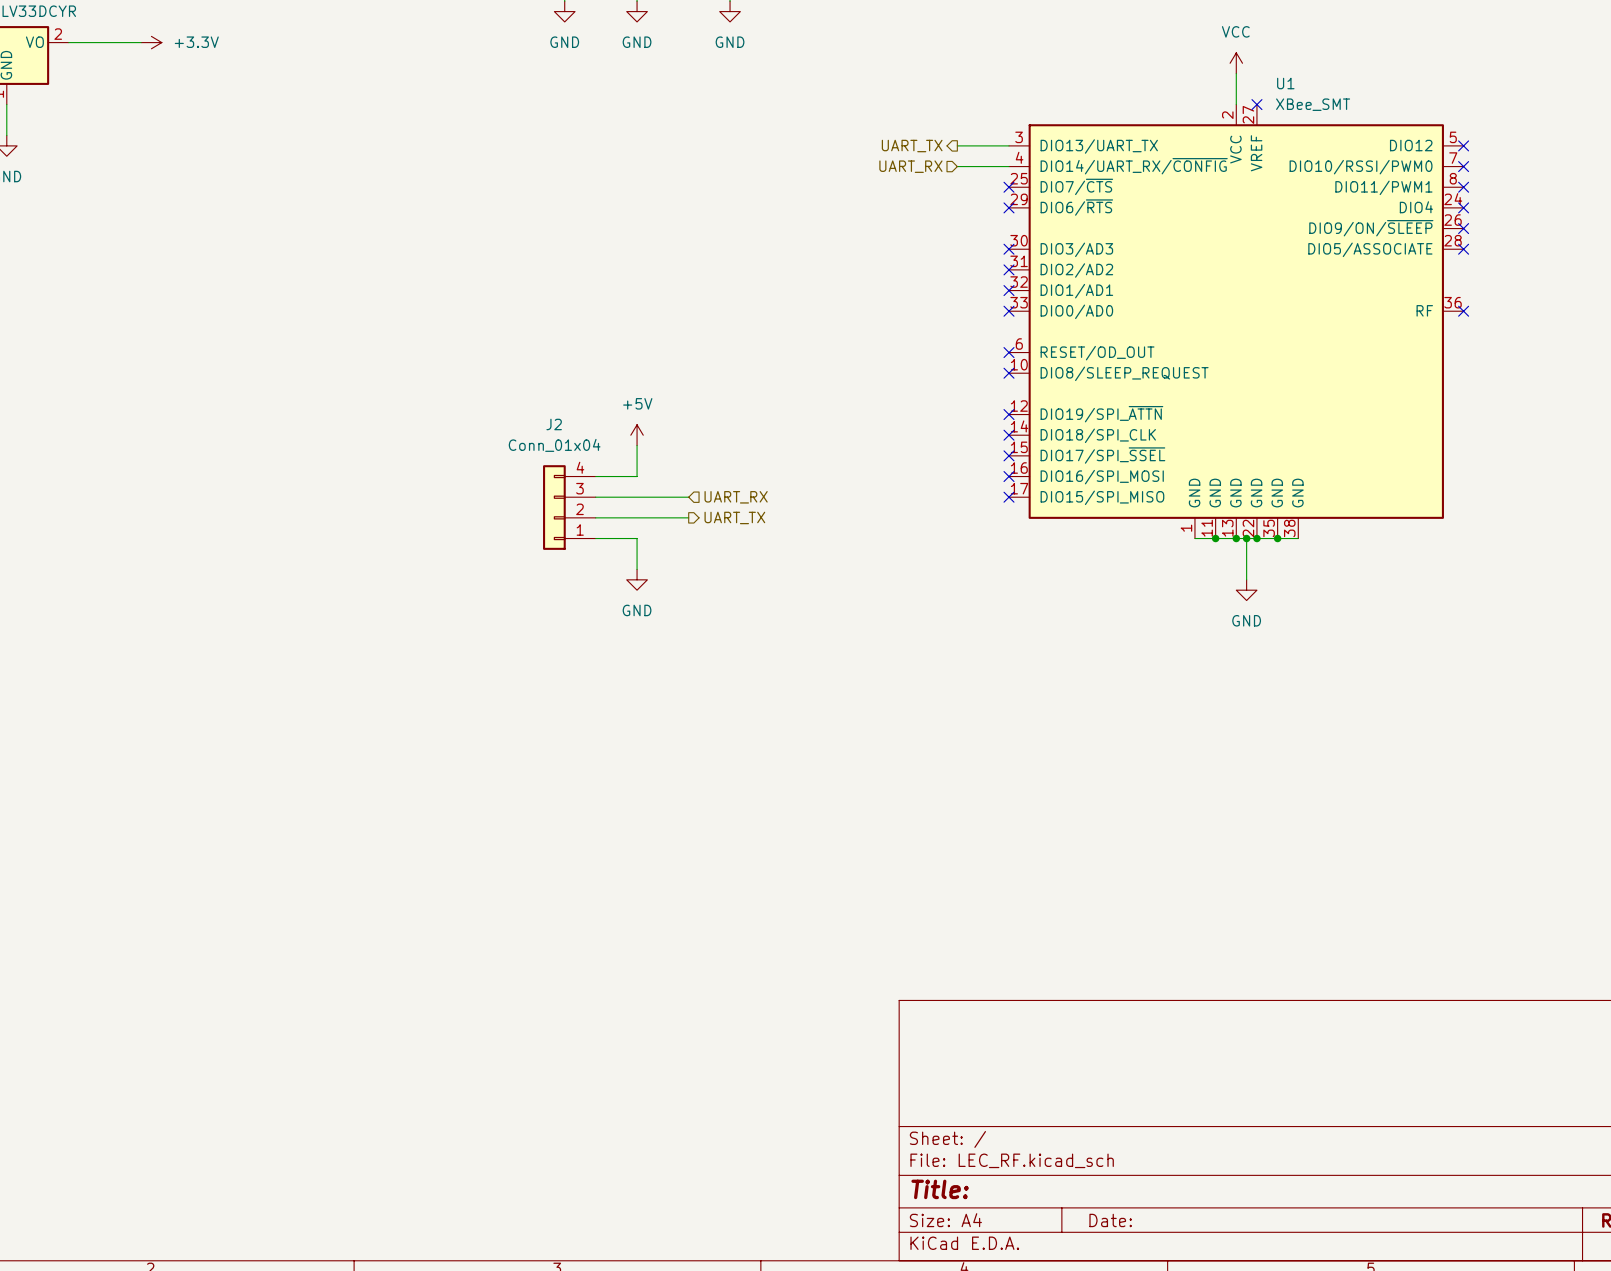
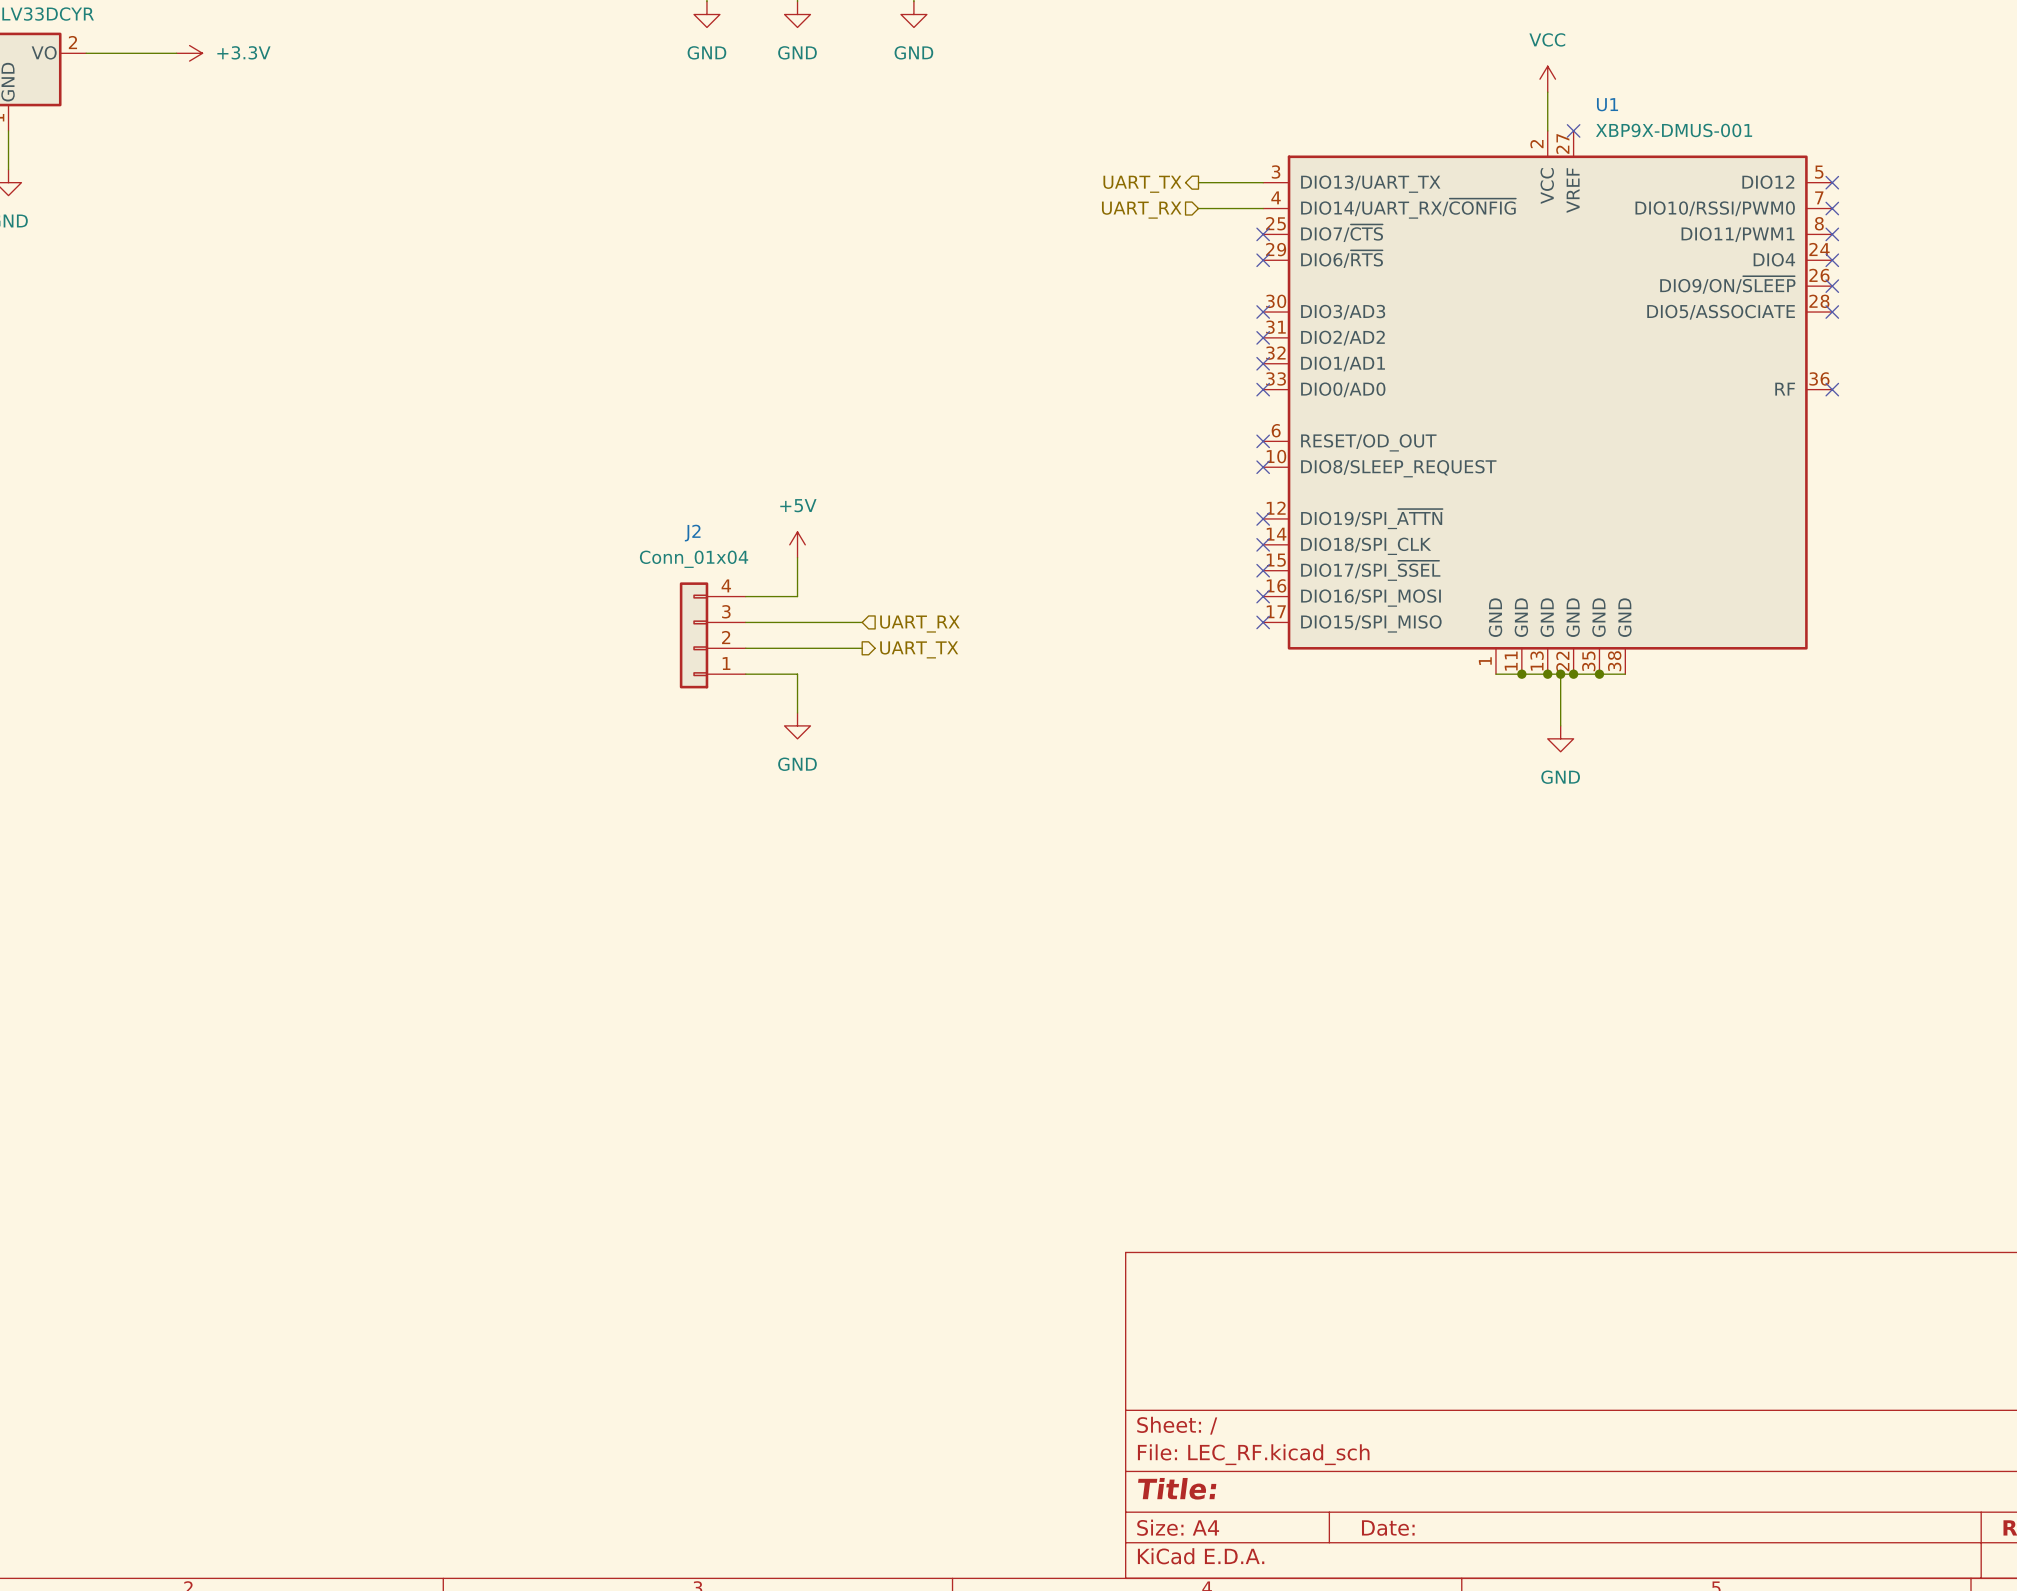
U1 value: XBee_SMT (1313, 104) -> XBP9X-DMUS-001 (1674, 130)

